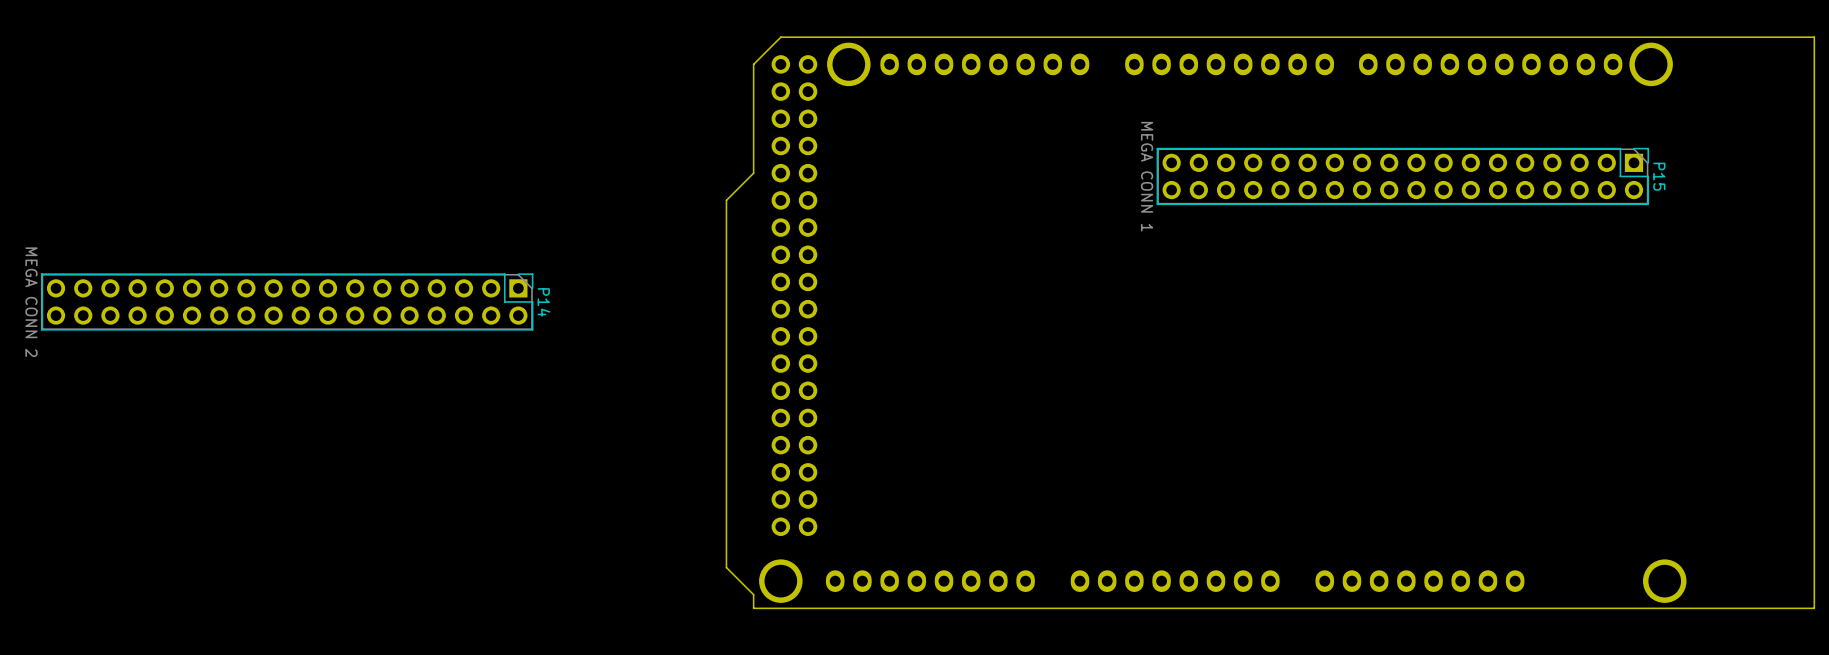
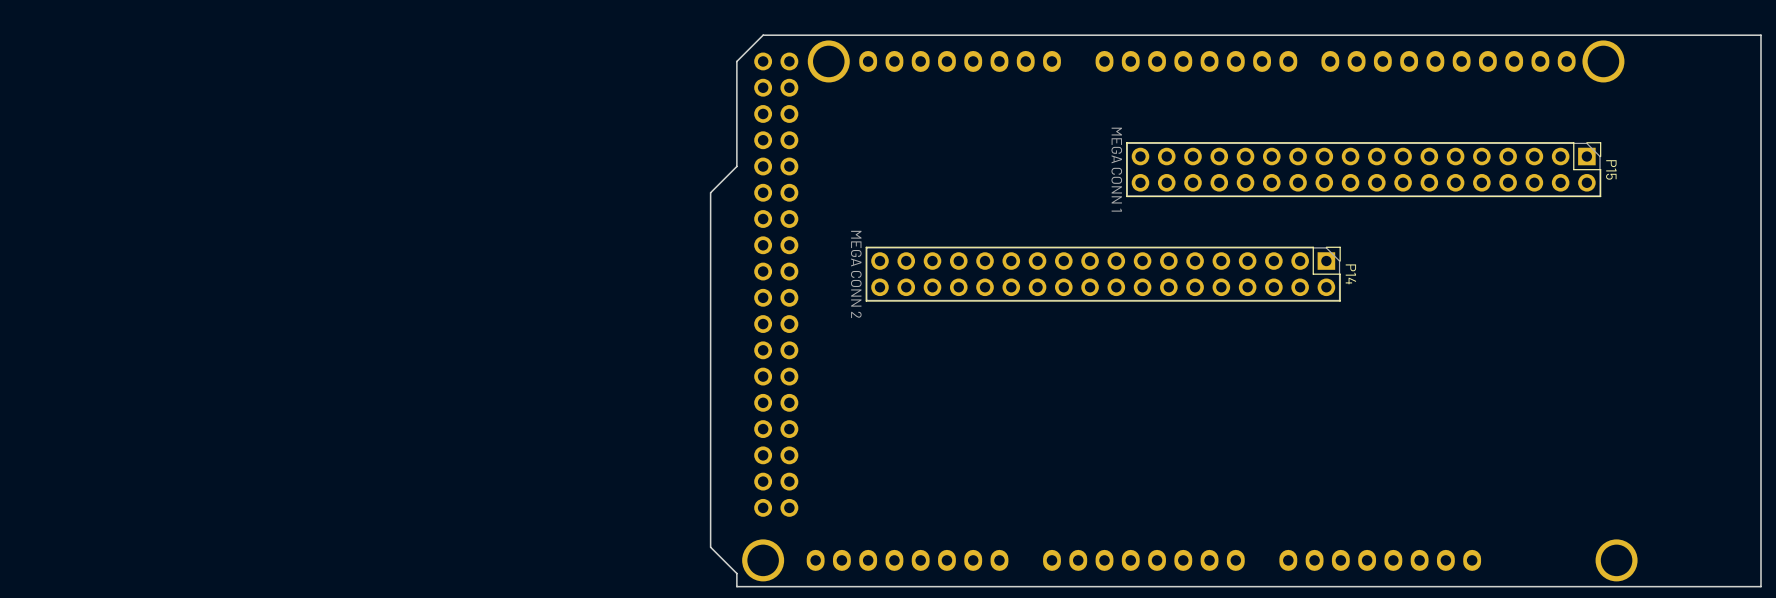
P14 position: (287, 301) -> (1103, 274)

